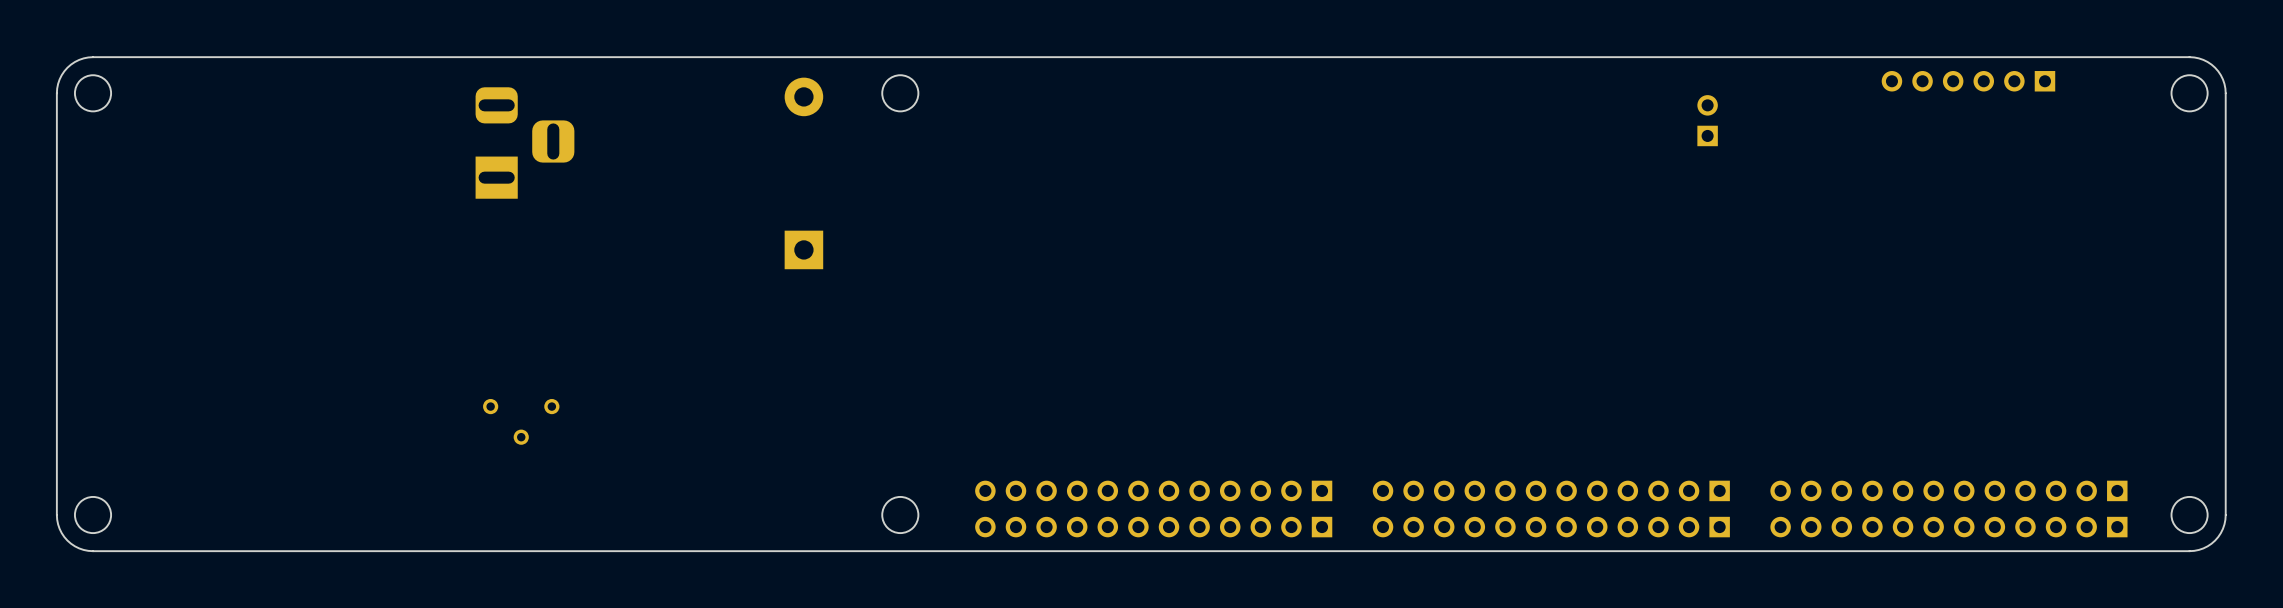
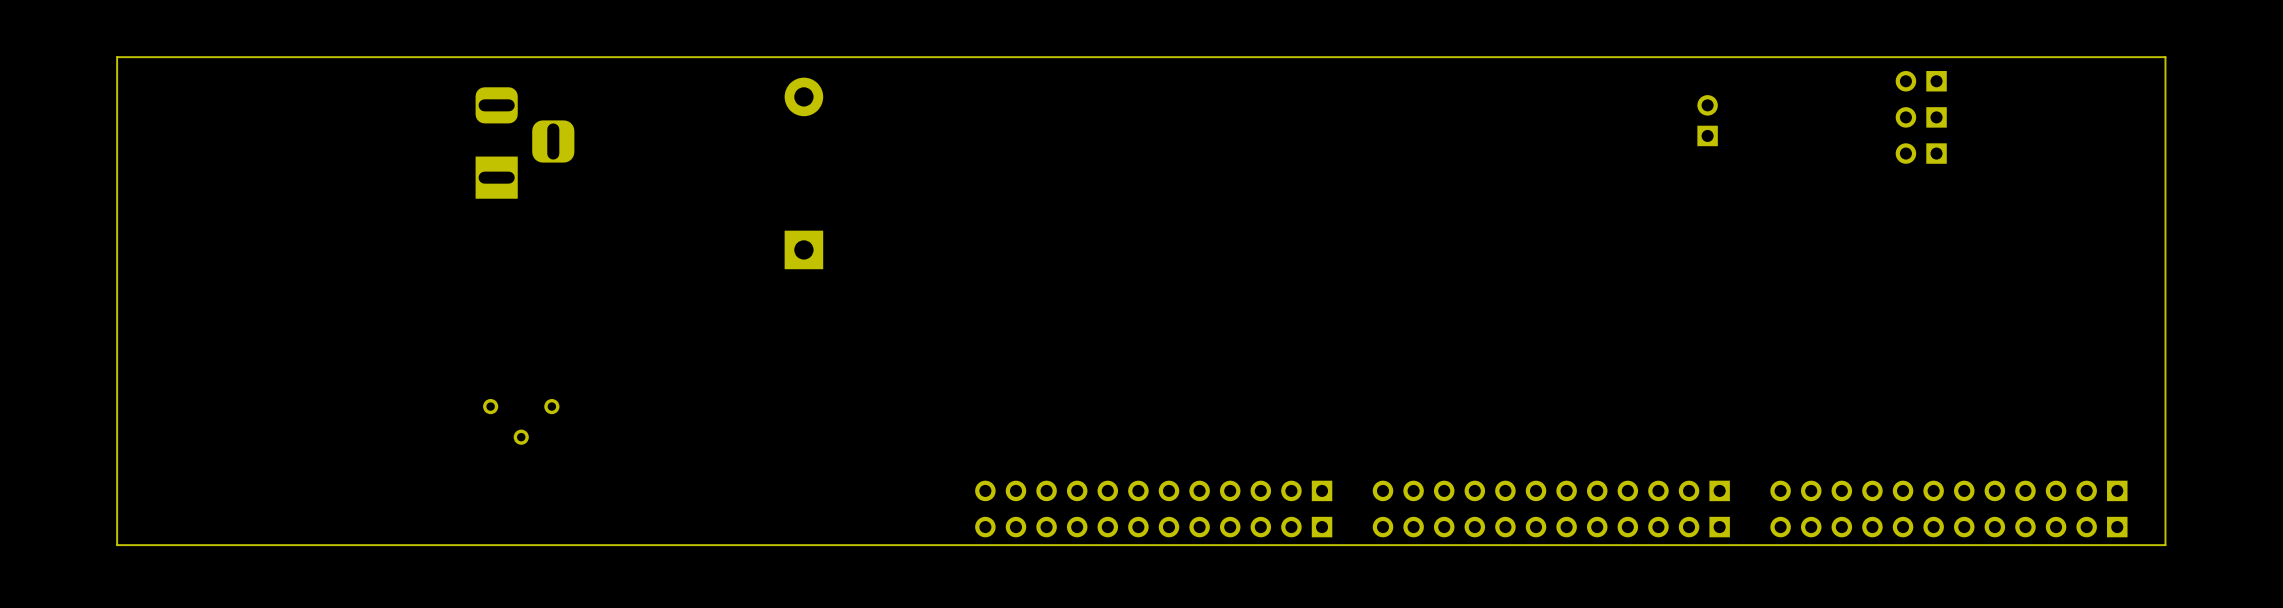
board edge: (2165, 57) (2194, 57) (2207, 61) (2220, 75) (2225, 93) (2225, 519) (2220, 533) (2211, 543) (2198, 549) (2189, 551) (83, 549) (71, 543) (64, 537) (58, 524) (56, 515) (57, 88) (64, 71) (74, 61) (88, 57) (117, 57) -> (2165, 57) (2165, 545) (117, 545) (117, 57)
round board edge: [74, 74, 112, 112] -> none
round board edge: [881, 74, 919, 112] -> none
round board edge: [2171, 74, 2208, 112] -> none
part: none -> (1921, 81)
part: (1968, 81) -> none
part: none -> (1921, 117)
part: none -> (1921, 153)
round board edge: [74, 496, 112, 534] -> none
round board edge: [881, 496, 919, 534] -> none
round board edge: [2171, 496, 2208, 534] -> none

